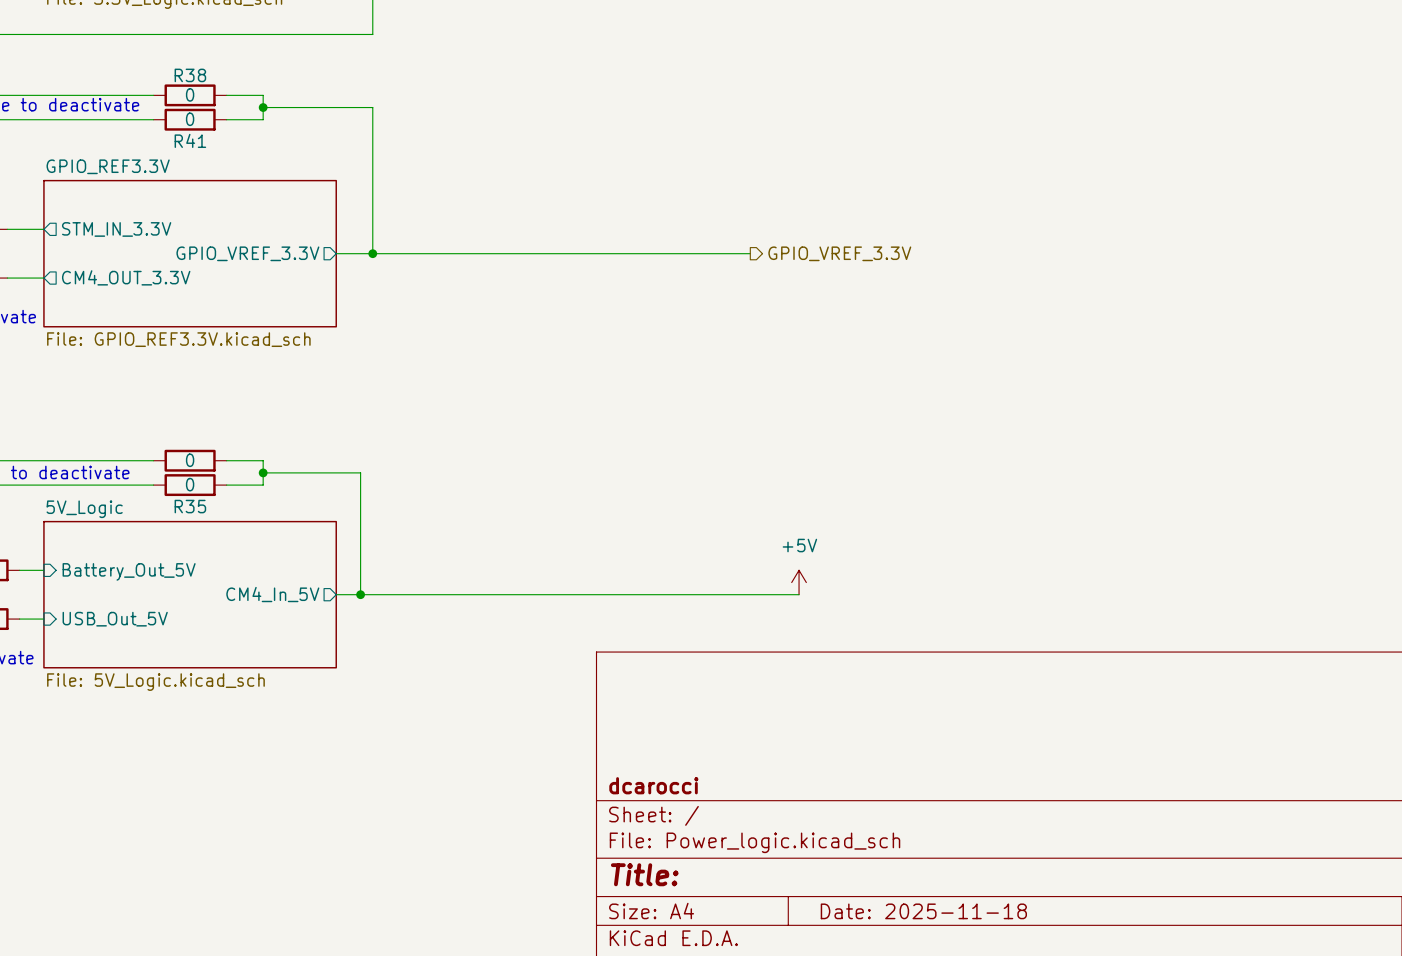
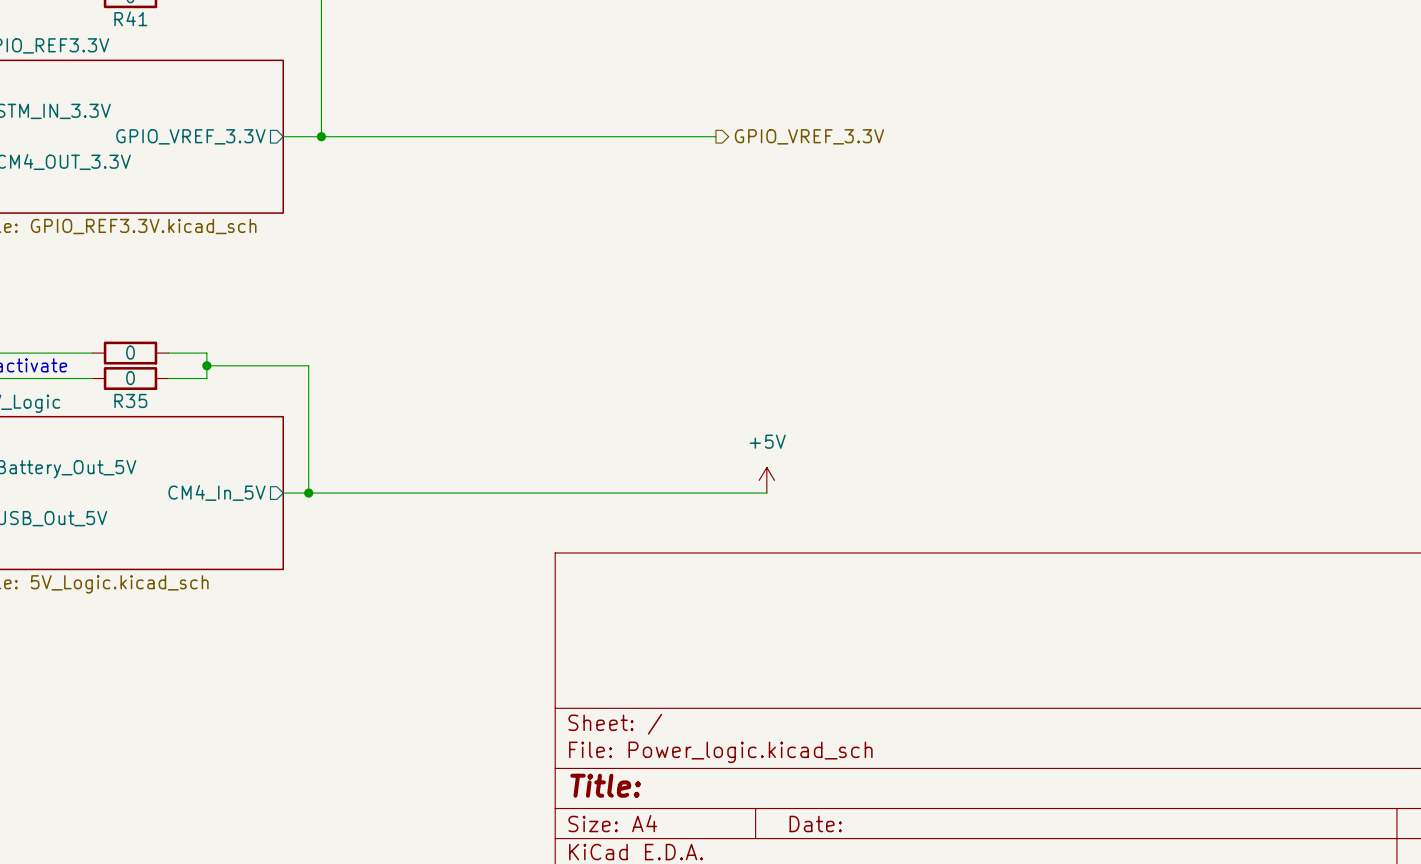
title block: dcarocci (653, 785) -> none
title block: Date: 2025-11-18 (923, 911) -> Date: (815, 823)

